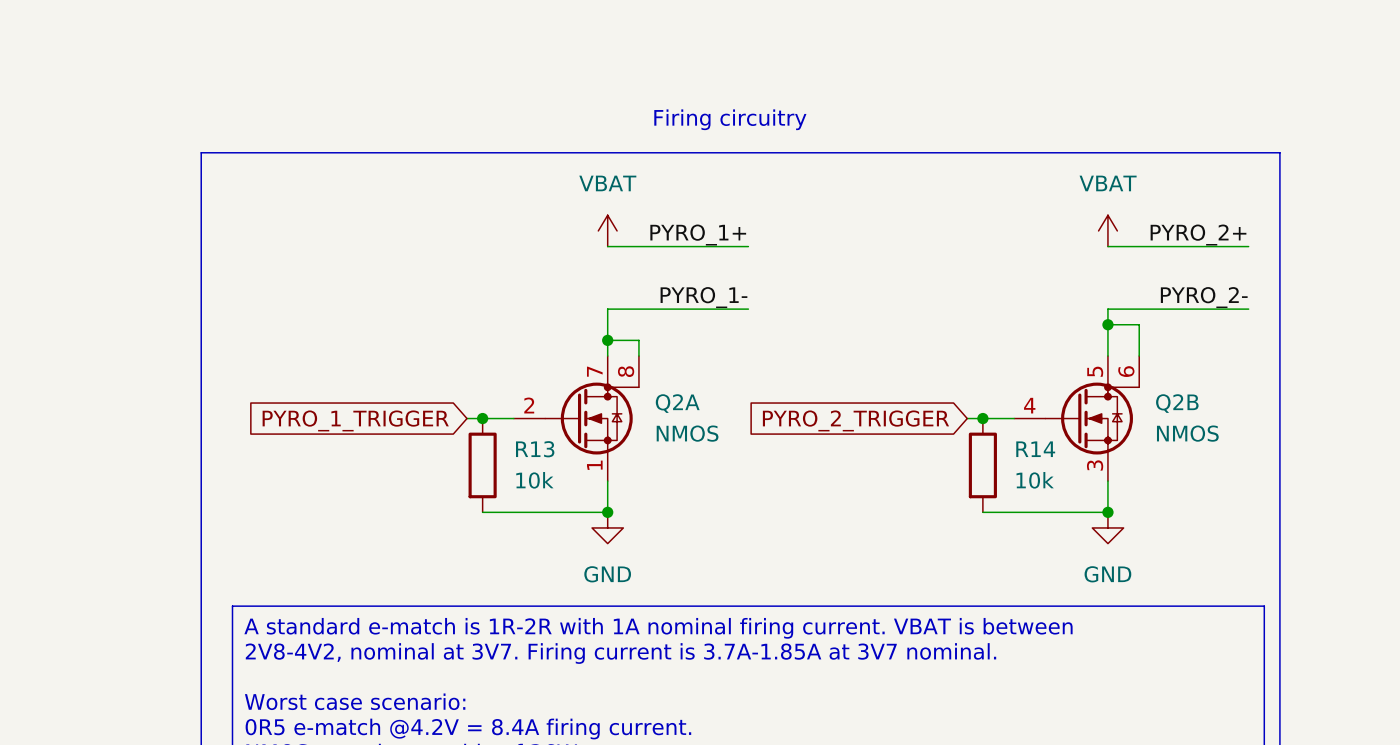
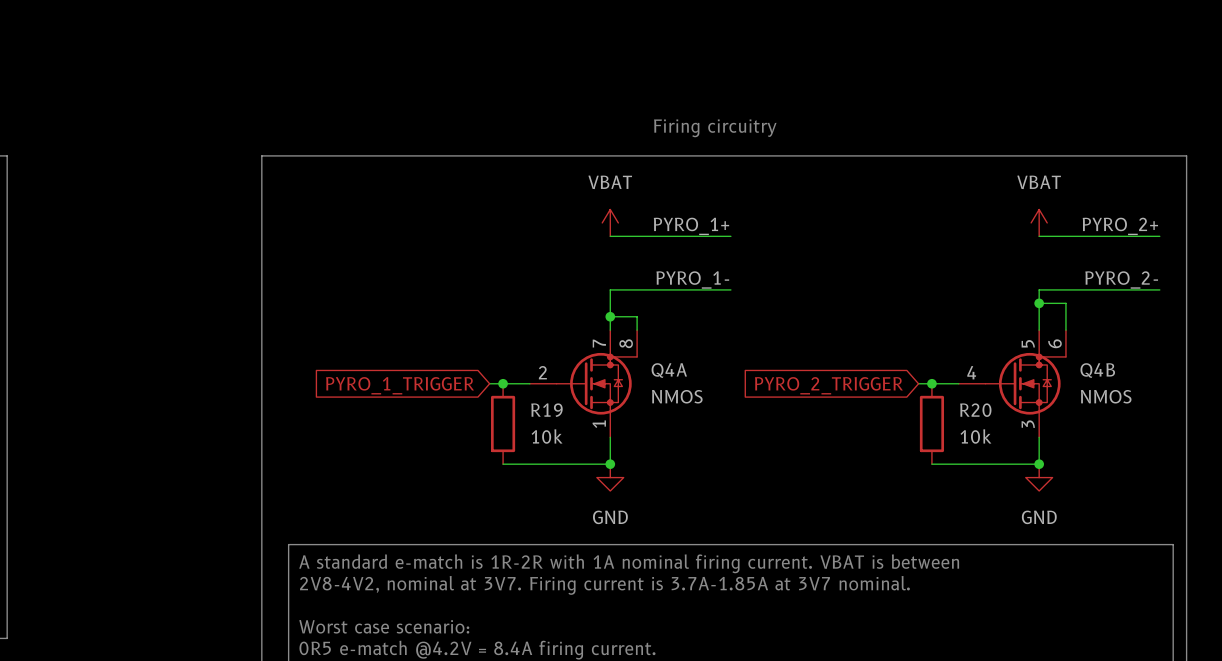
Q2A name: Q2A (677, 403) -> Q4A (669, 370)
Q2B name: Q2B (1177, 403) -> Q4B (1097, 370)
R13 name: R13 (535, 449) -> R19 (546, 410)
R14 name: R14 (1035, 449) -> R20 (975, 410)

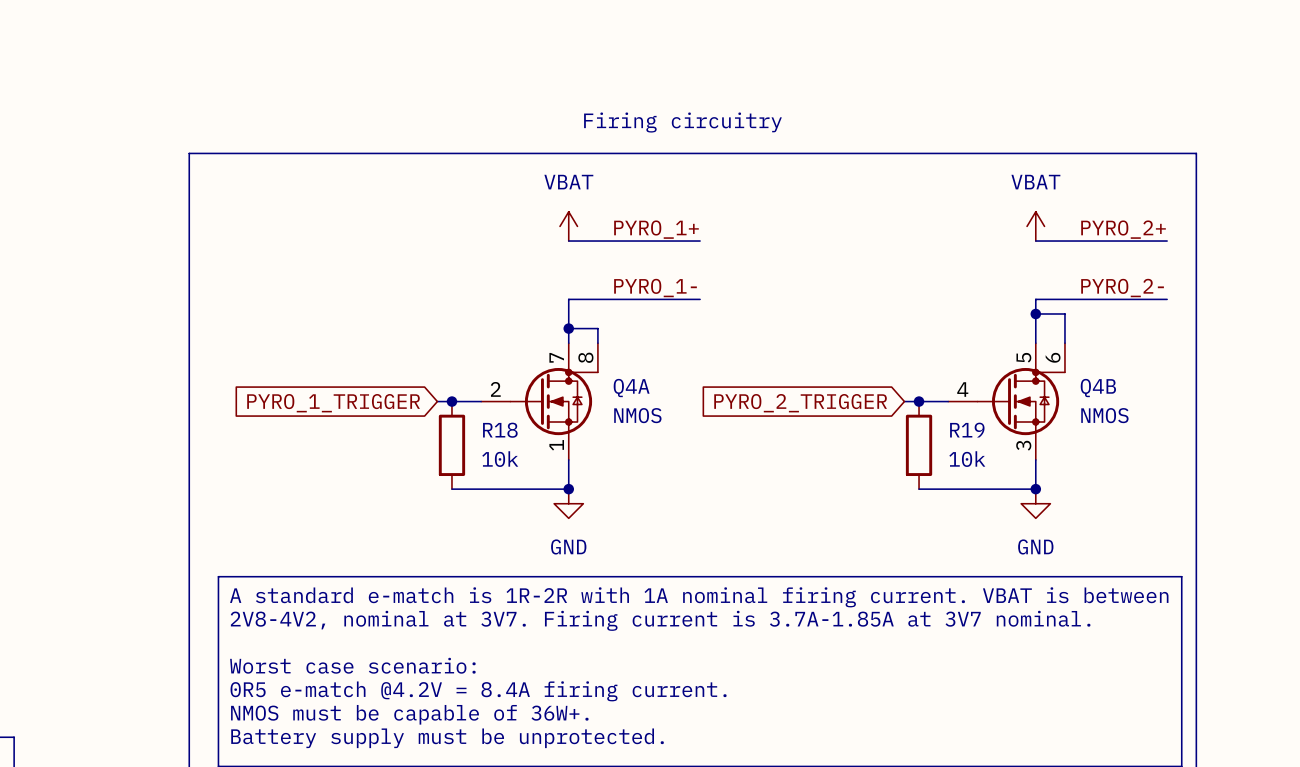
R19 name: R19 (546, 410) -> R18 (500, 430)
R20 name: R20 (975, 410) -> R19 (967, 430)

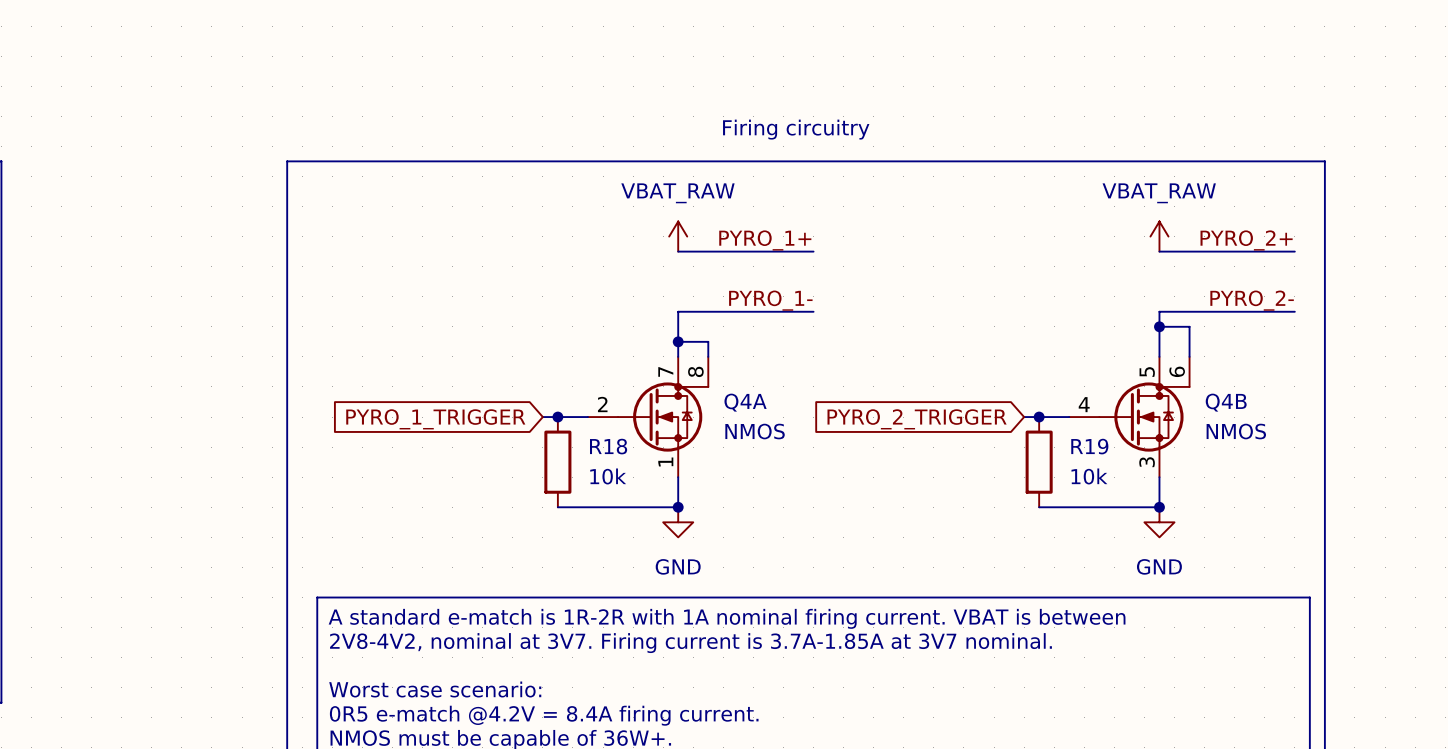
power symbol: VBAT (568, 226) -> VBAT_RAW (678, 236)
power symbol: VBAT (1035, 226) -> VBAT_RAW (1159, 236)

